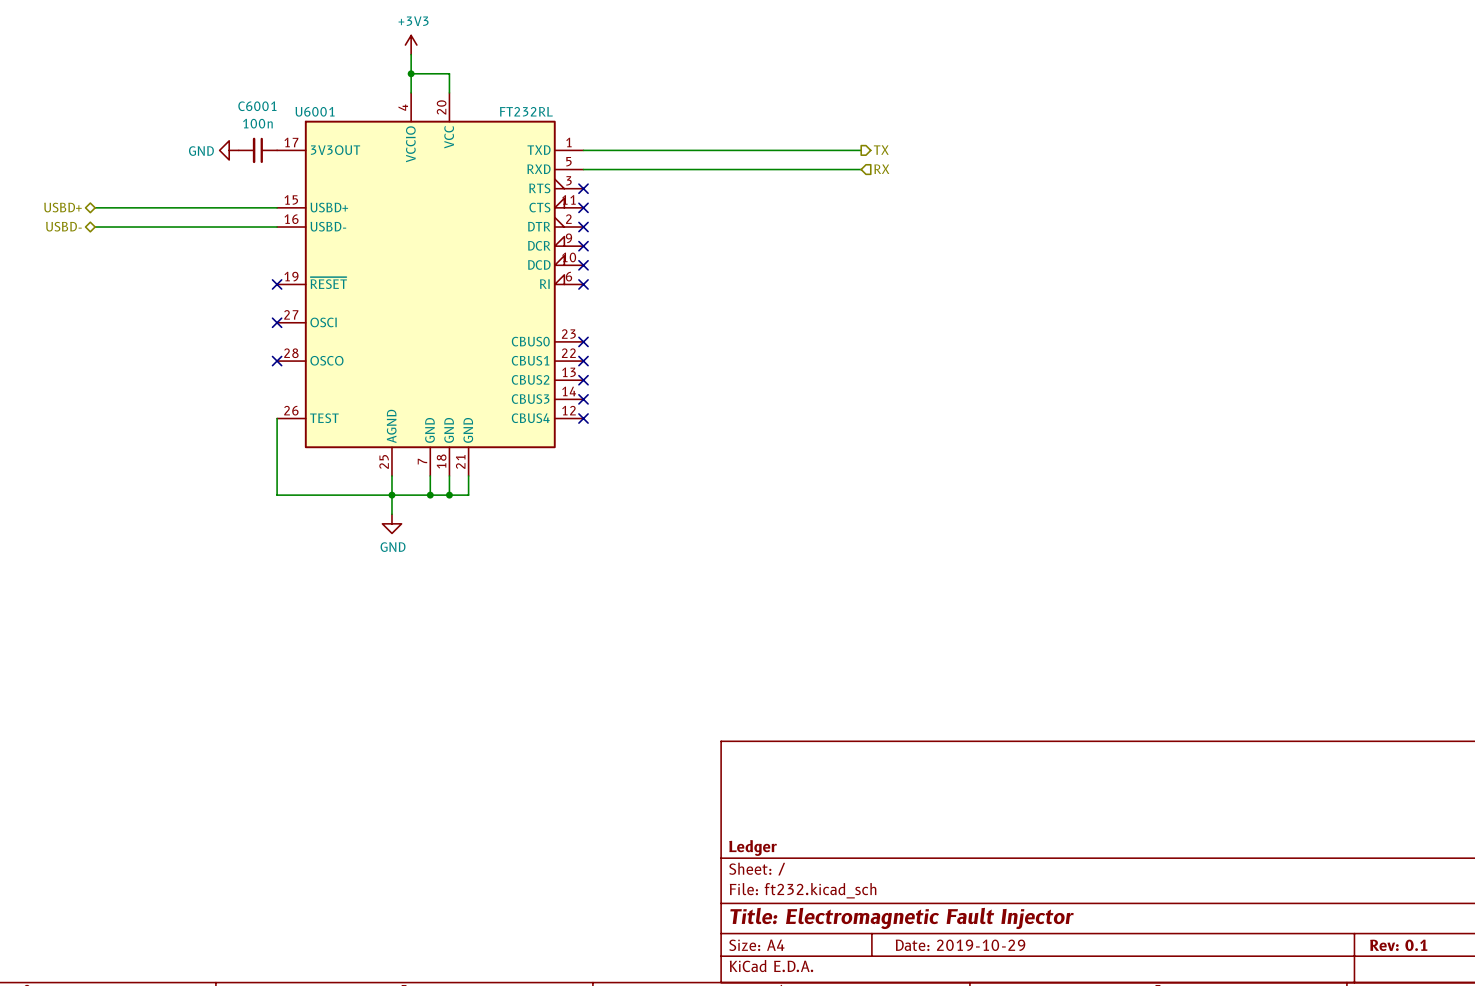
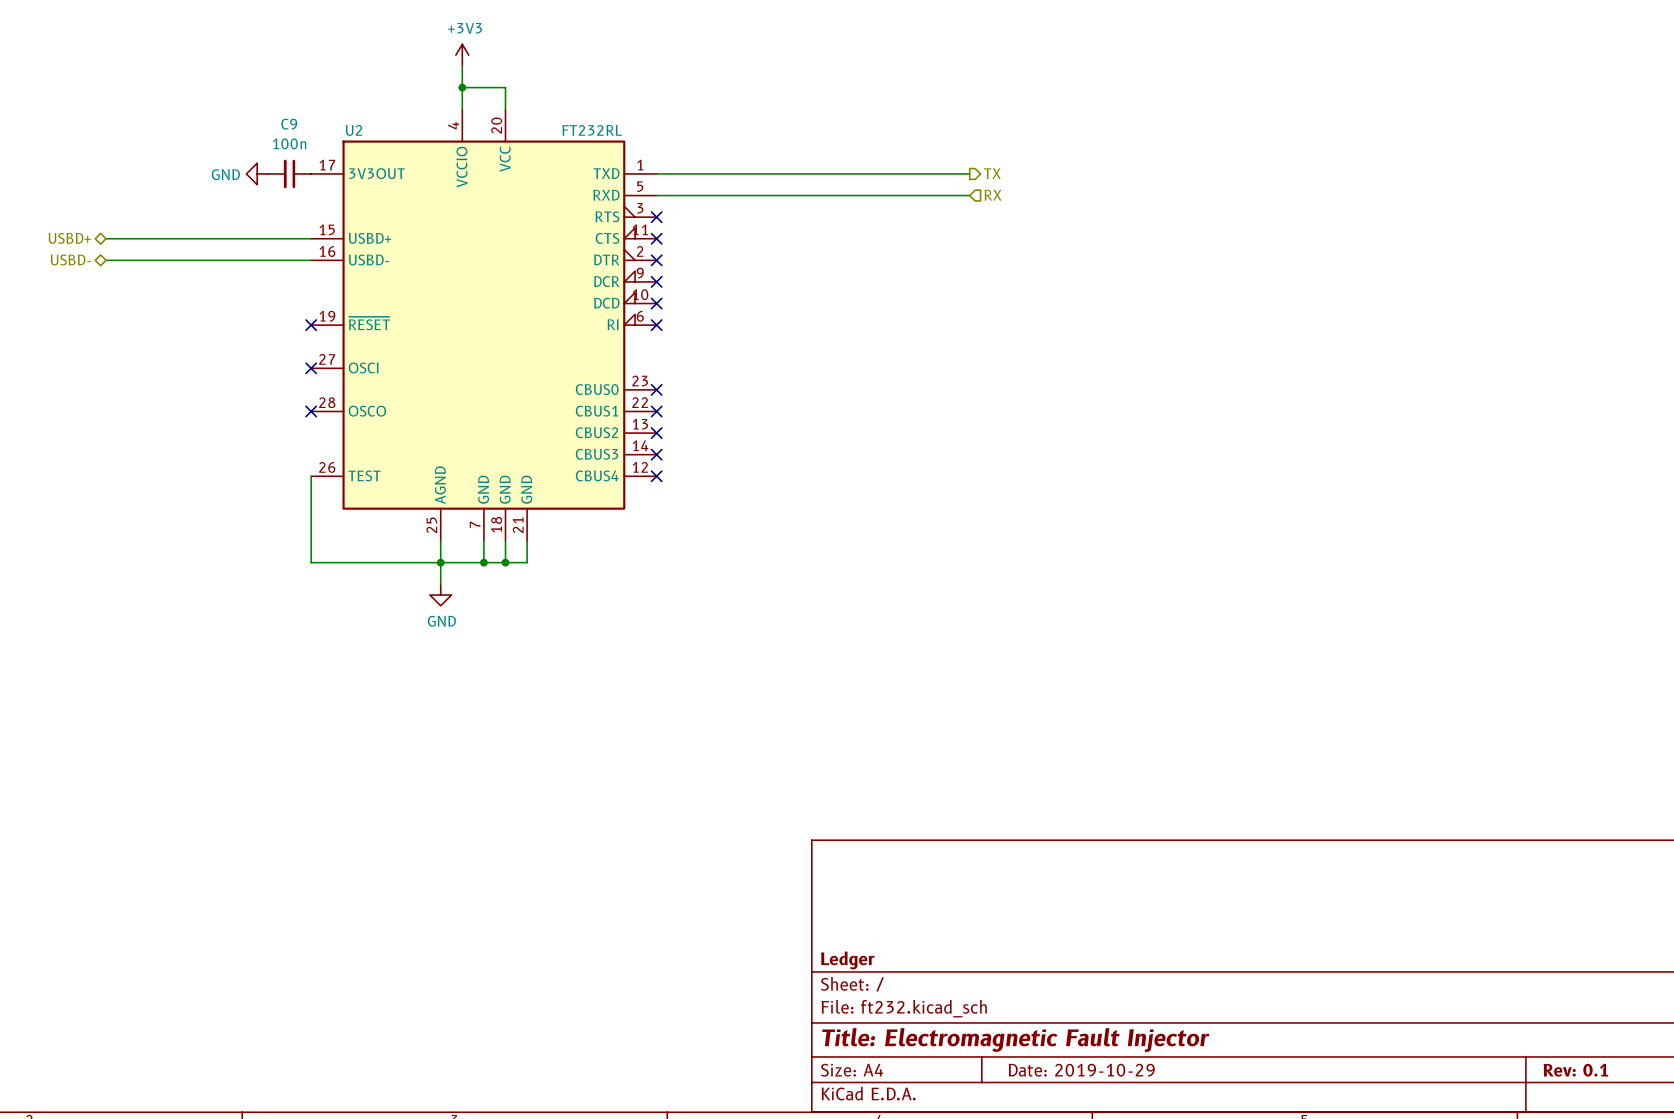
C6001 name: C6001 (257, 106) -> C9 (289, 124)
U6001 name: U6001 (315, 111) -> U2 (354, 130)

